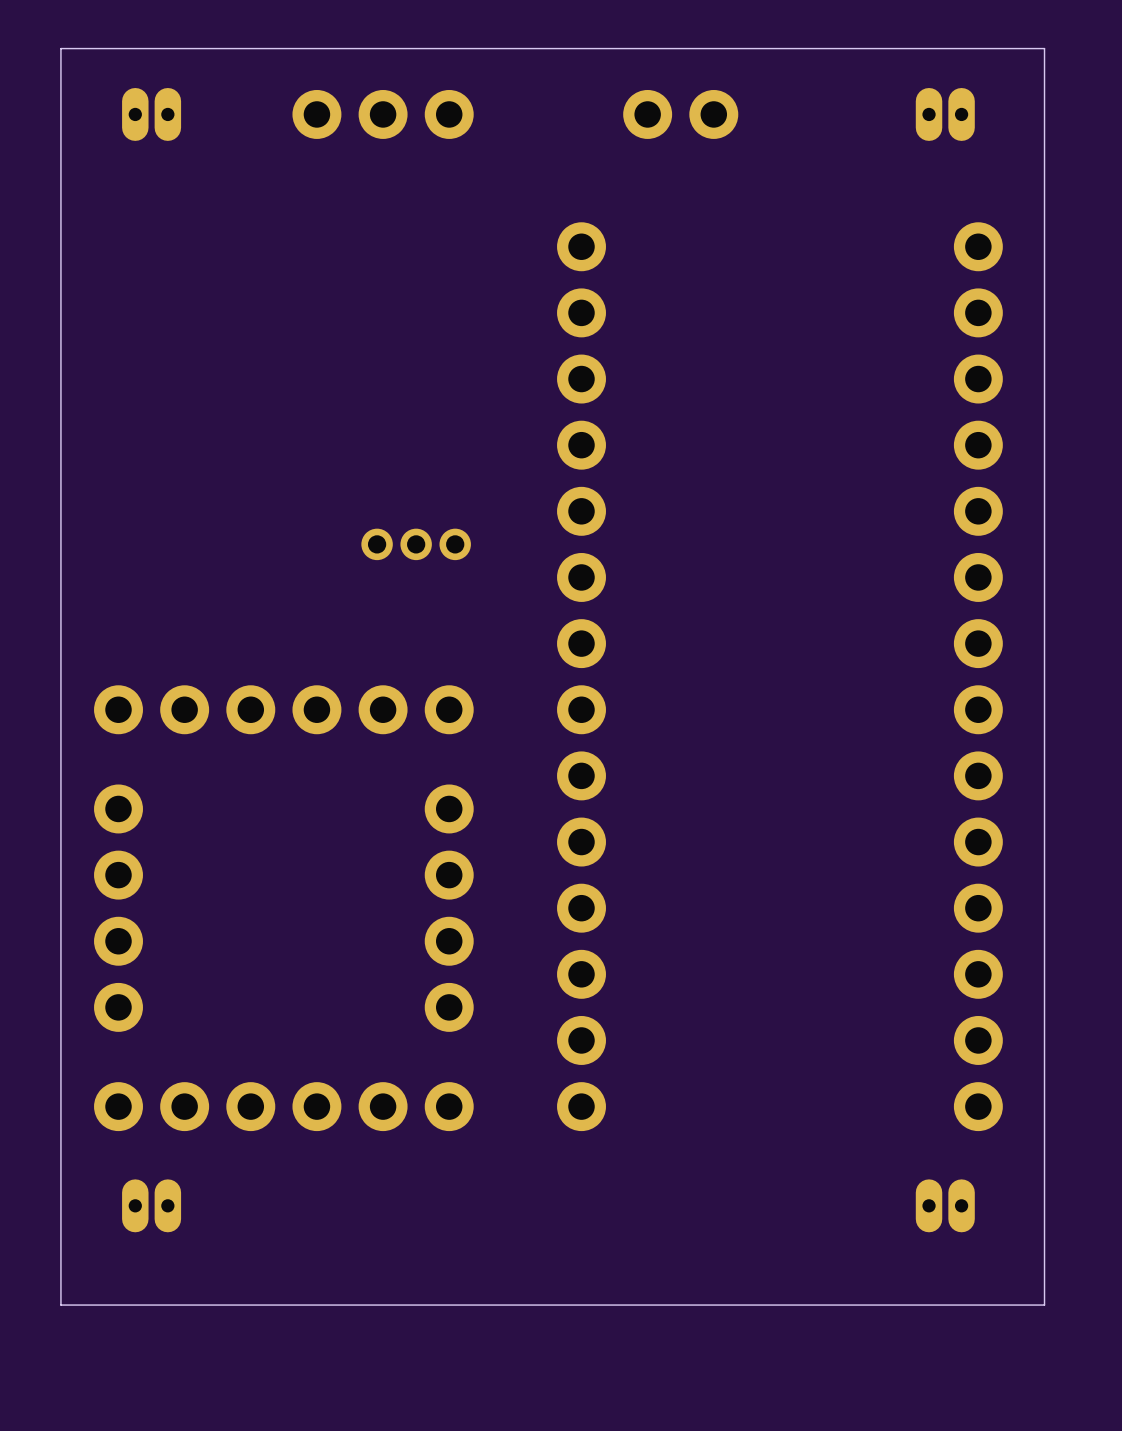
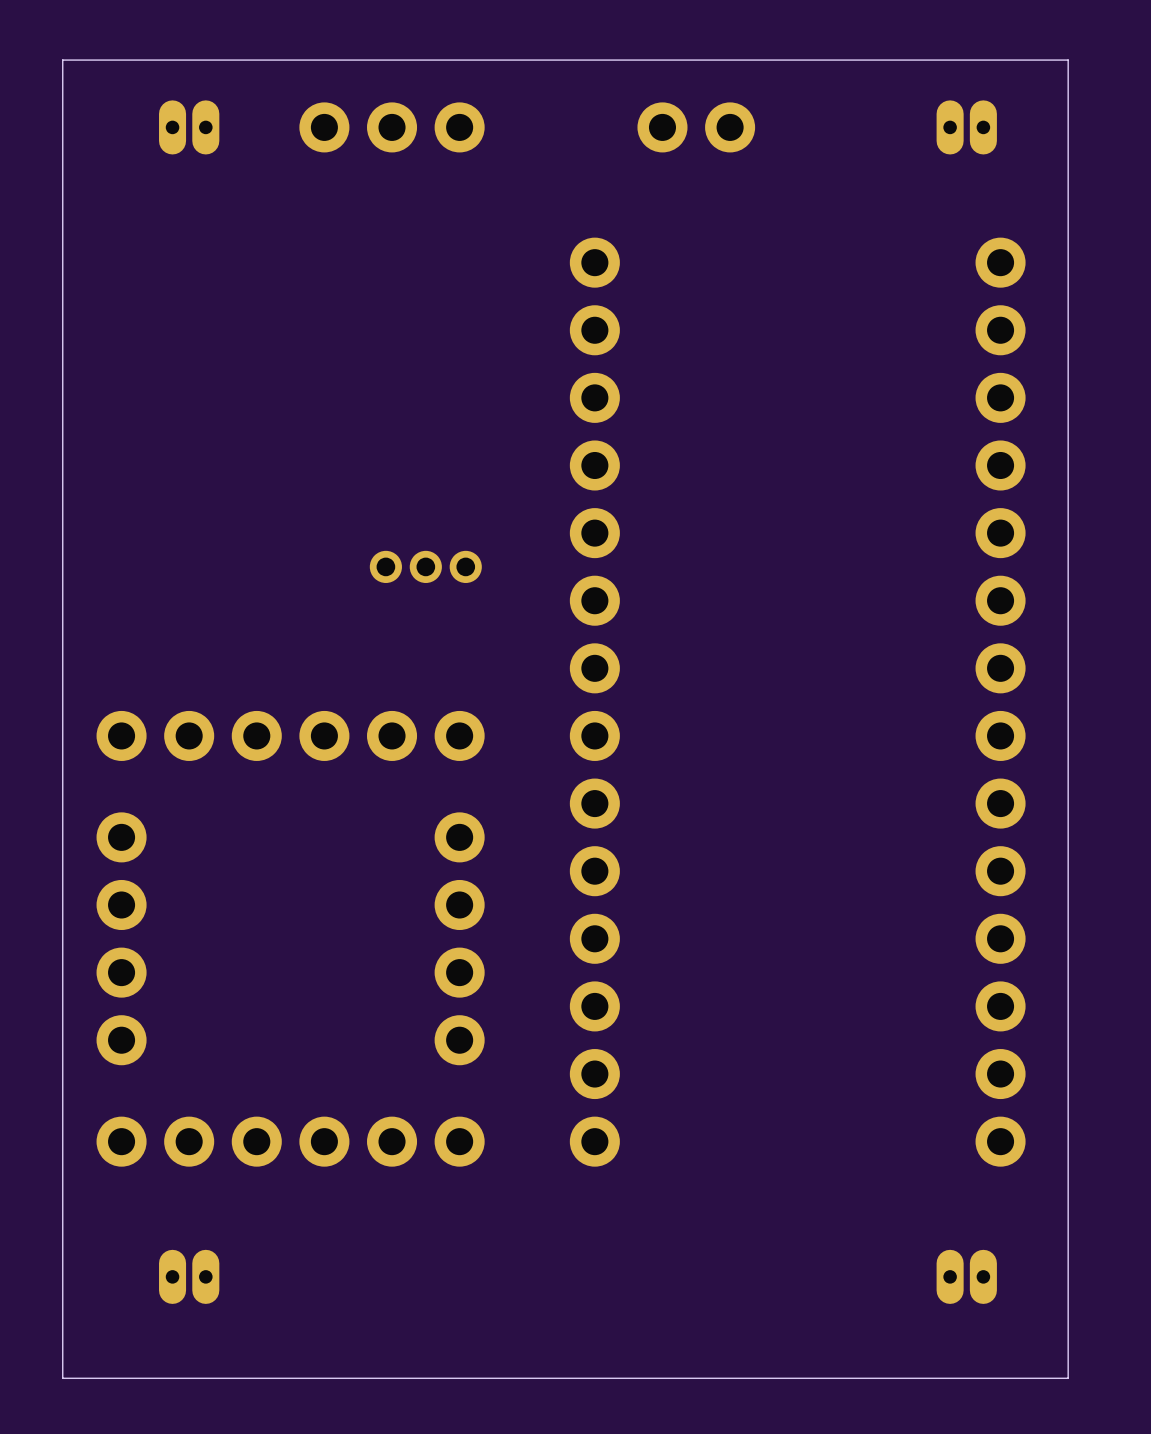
part position: (151, 114) -> (189, 127)
part position: (151, 1205) -> (189, 1276)
part position: (945, 1205) -> (966, 1276)
board edge: (1044, 1305) (60, 1305) -> (1068, 1344) (1068, 1378) (62, 1378) (62, 1344)

